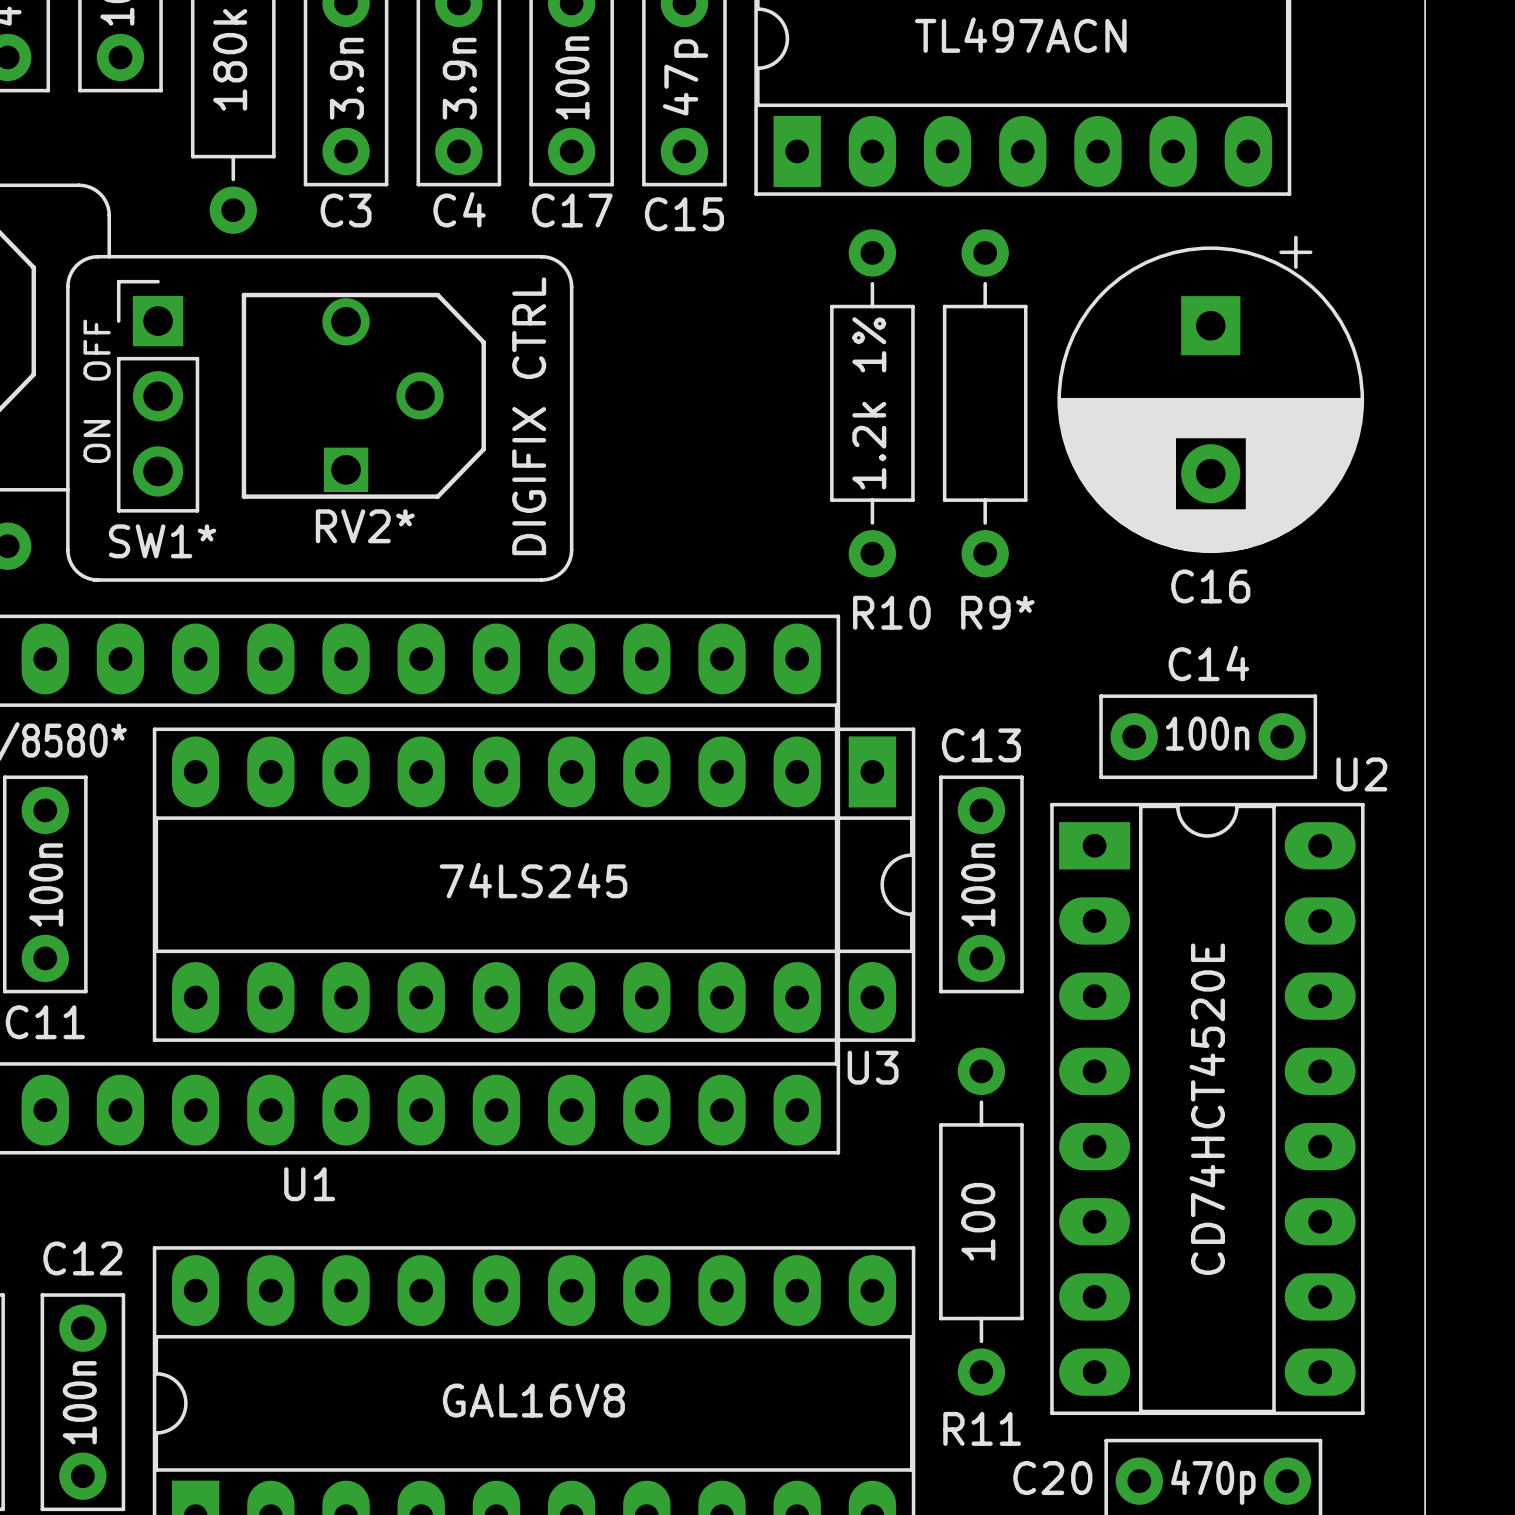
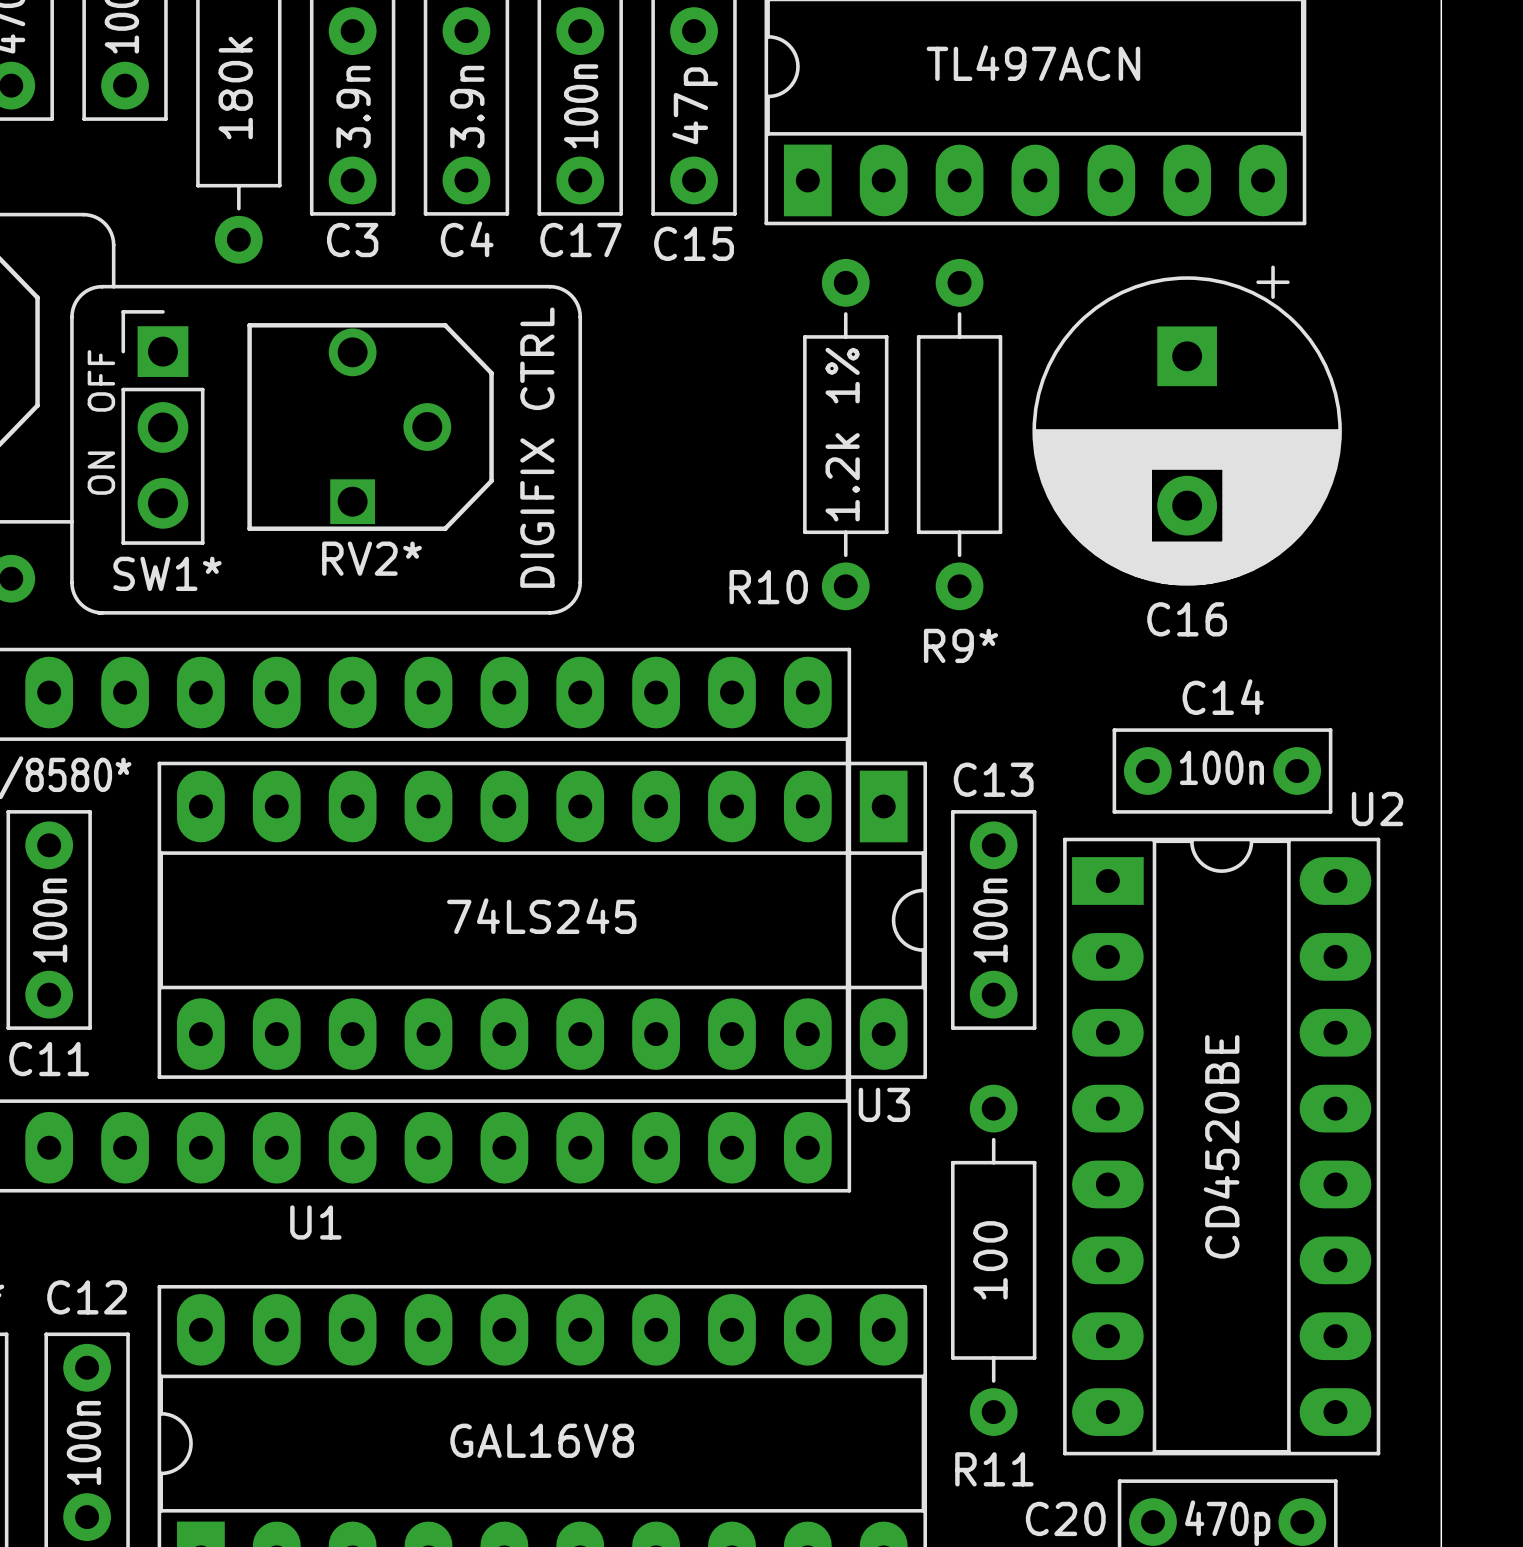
C16 position: (1210, 394) -> (1187, 425)
R10 position: (872, 403) -> (845, 434)
part position: (985, 403) -> (959, 434)
R10 name position: R10 (891, 612) -> R10 (768, 587)
text position: R9* (997, 612) -> R9* (960, 645)
U2 value: CD74HCT4520E (1207, 1109) -> CD4520BE (1221, 1146)

